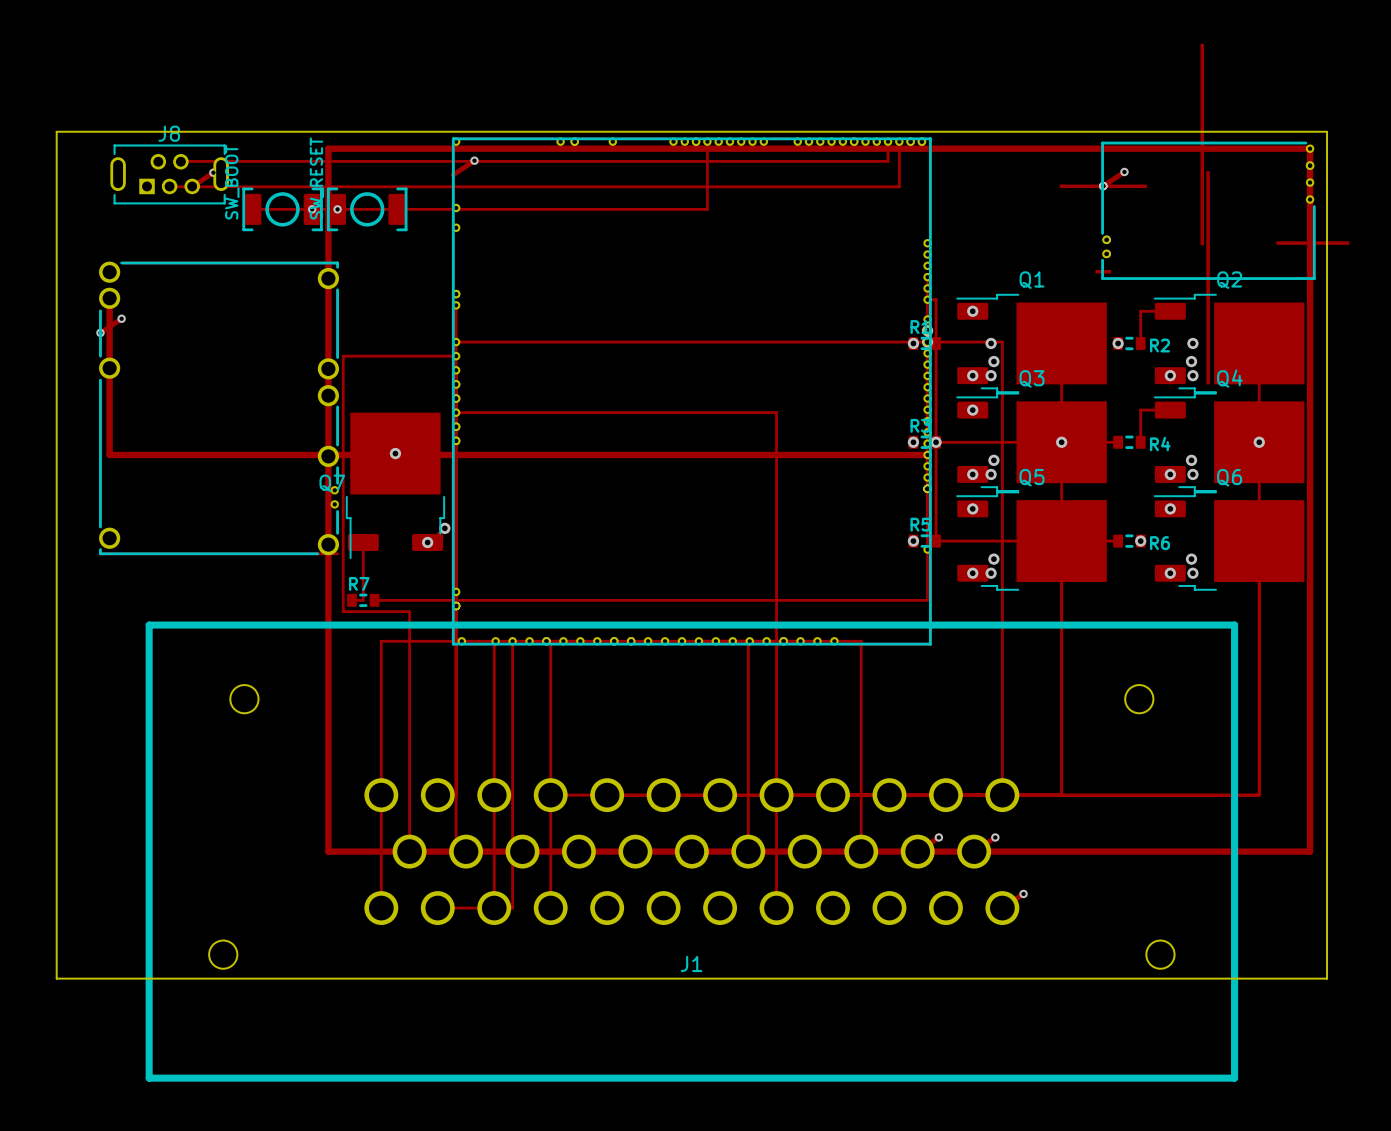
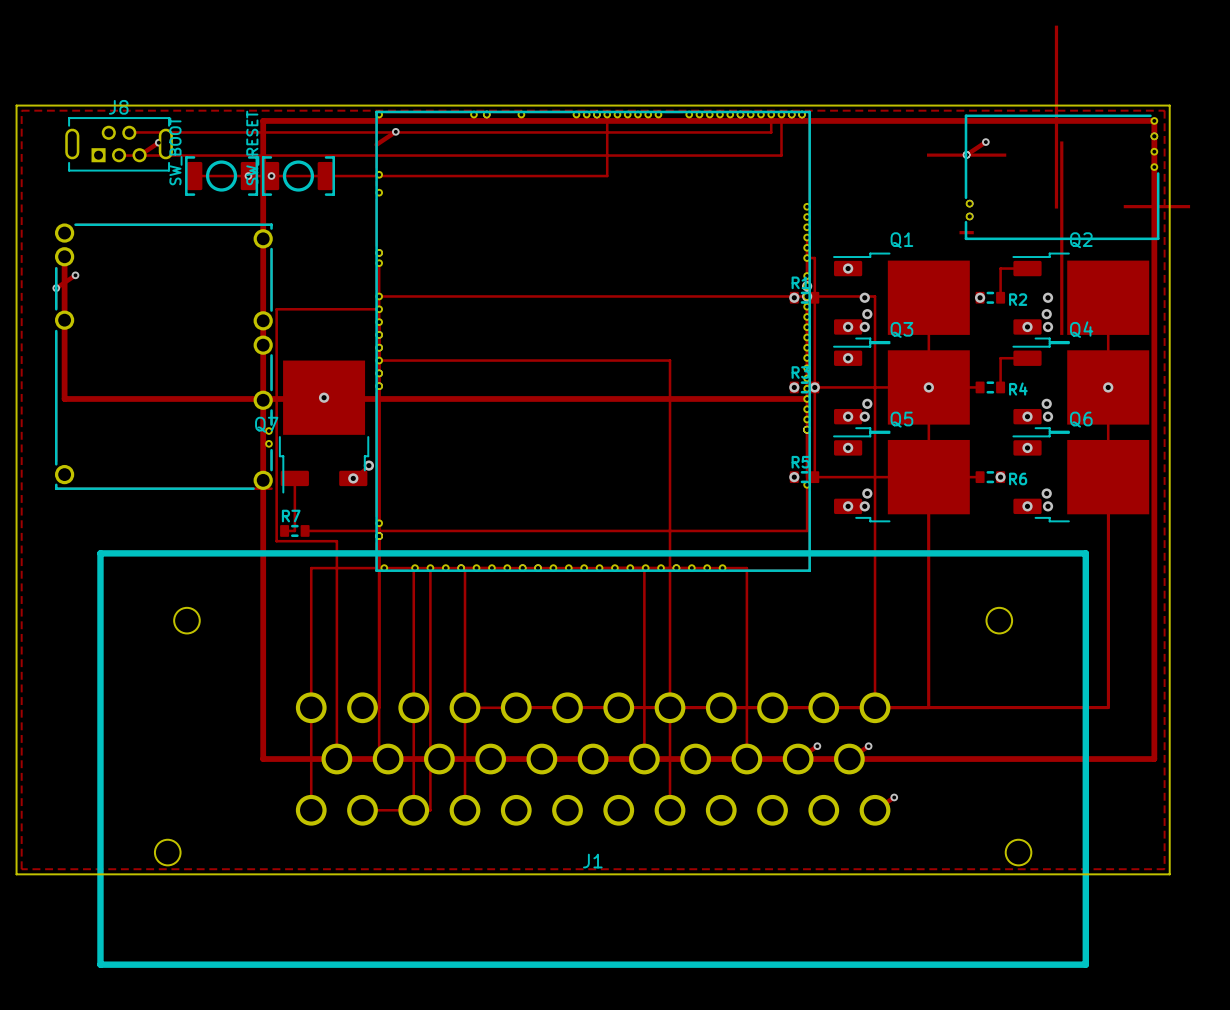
zone outline: none -> (21, 110) (1164, 110) (1164, 869) (21, 869) (21, 110)

